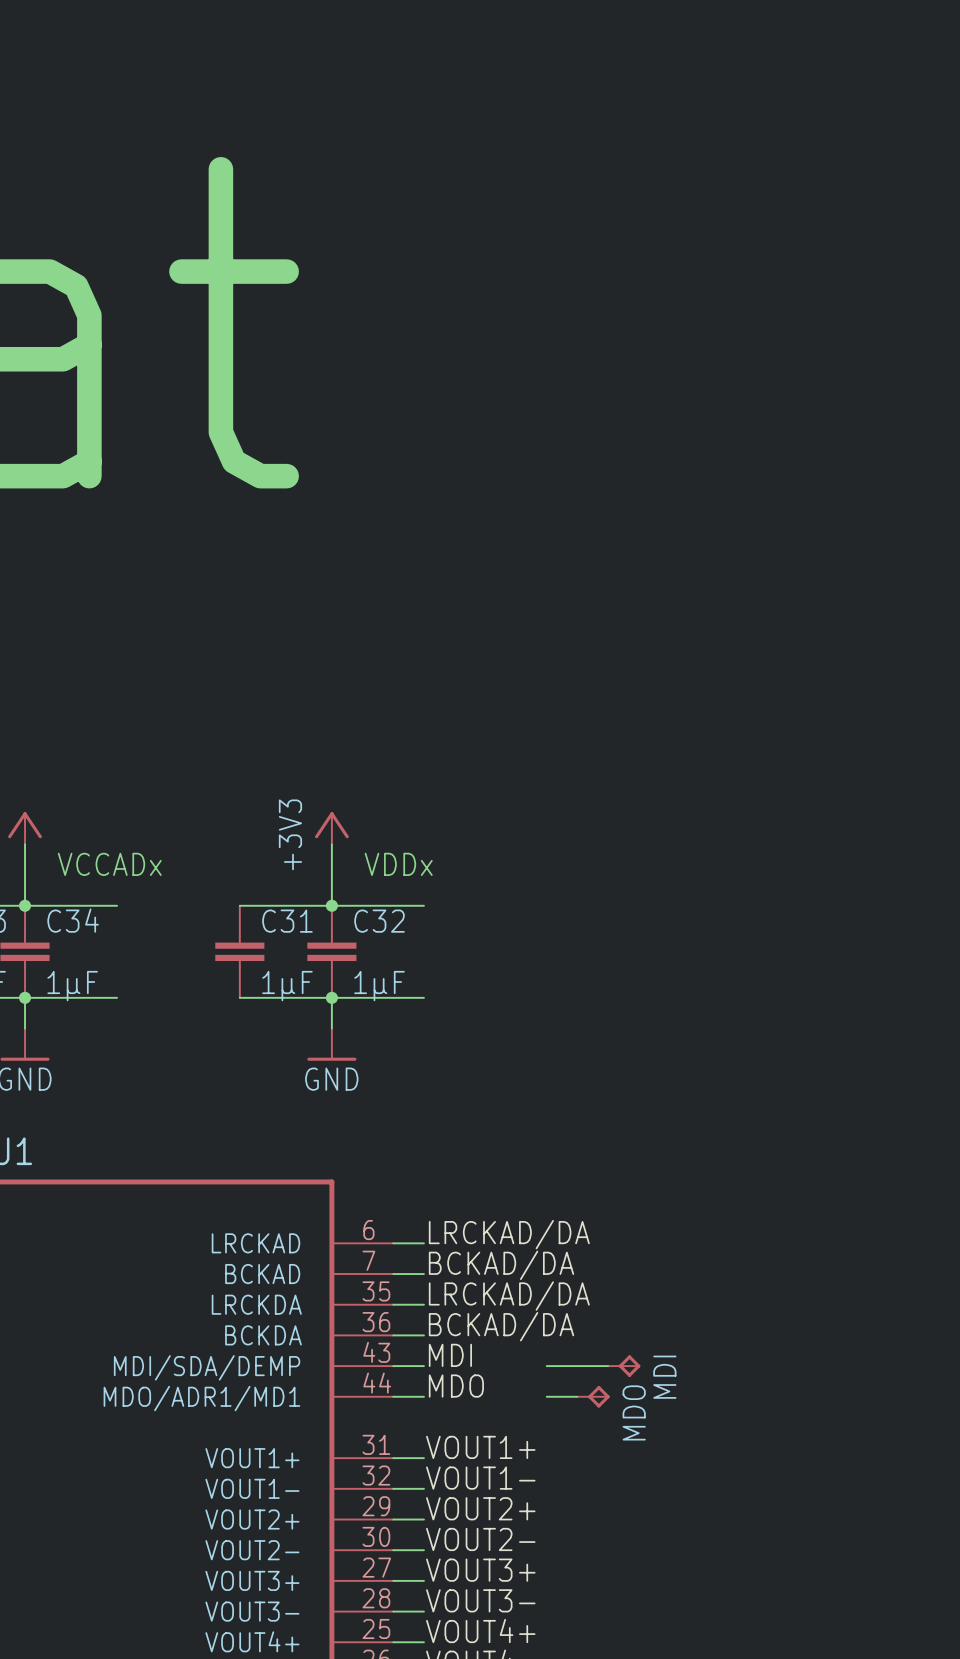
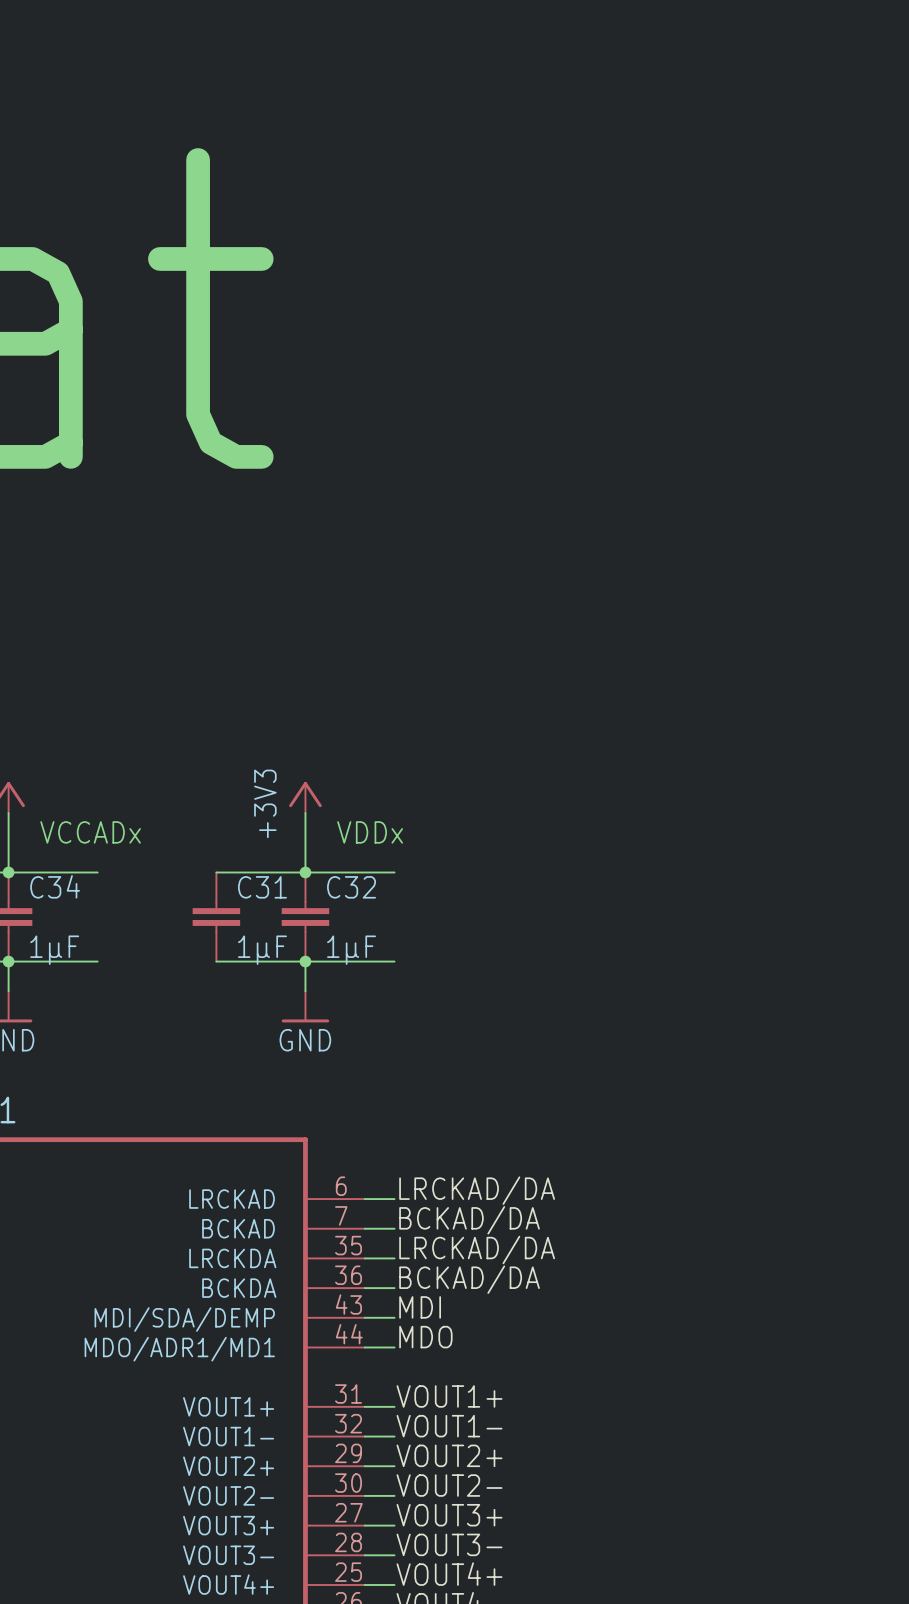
wire: (546, 1366) (608, 1366) -> none
MDI: (624, 1366) -> none
wire: (546, 1396) (577, 1396) -> none
MDO: (593, 1396) -> none

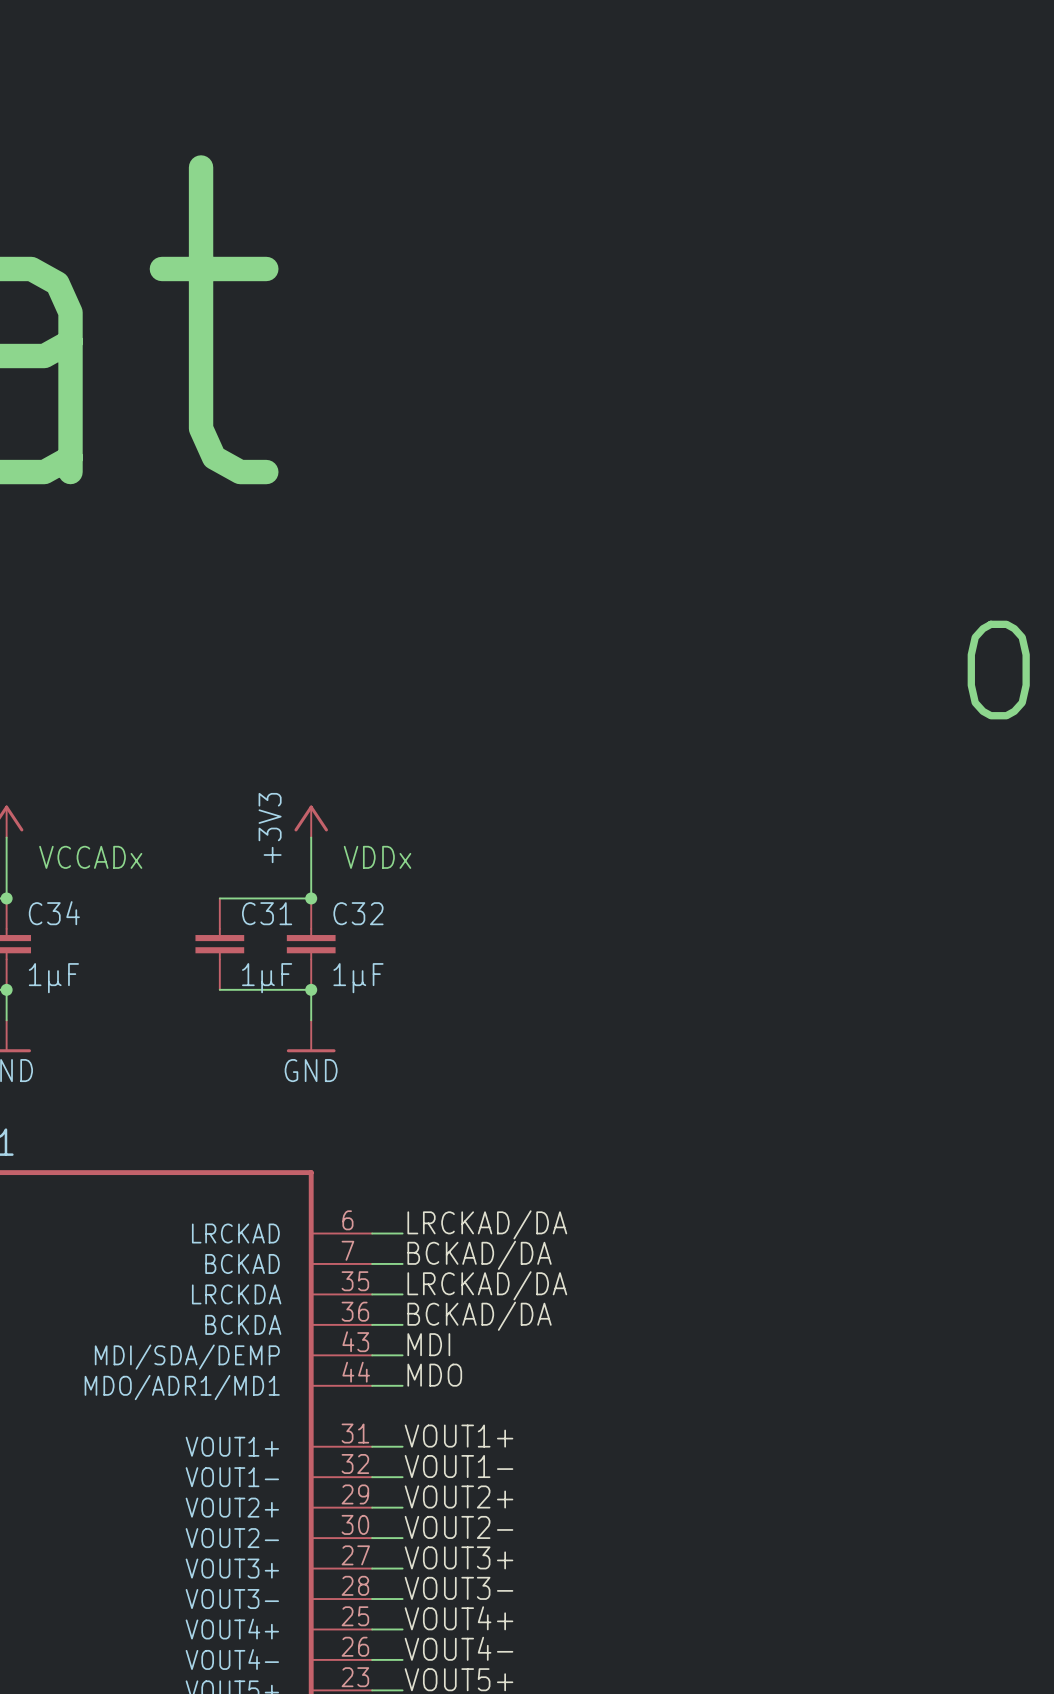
wire: (8, 872) (97, 872) -> none
wire: (305, 872) (394, 872) -> none
wire: (8, 961) (97, 961) -> none
wire: (305, 961) (394, 961) -> none

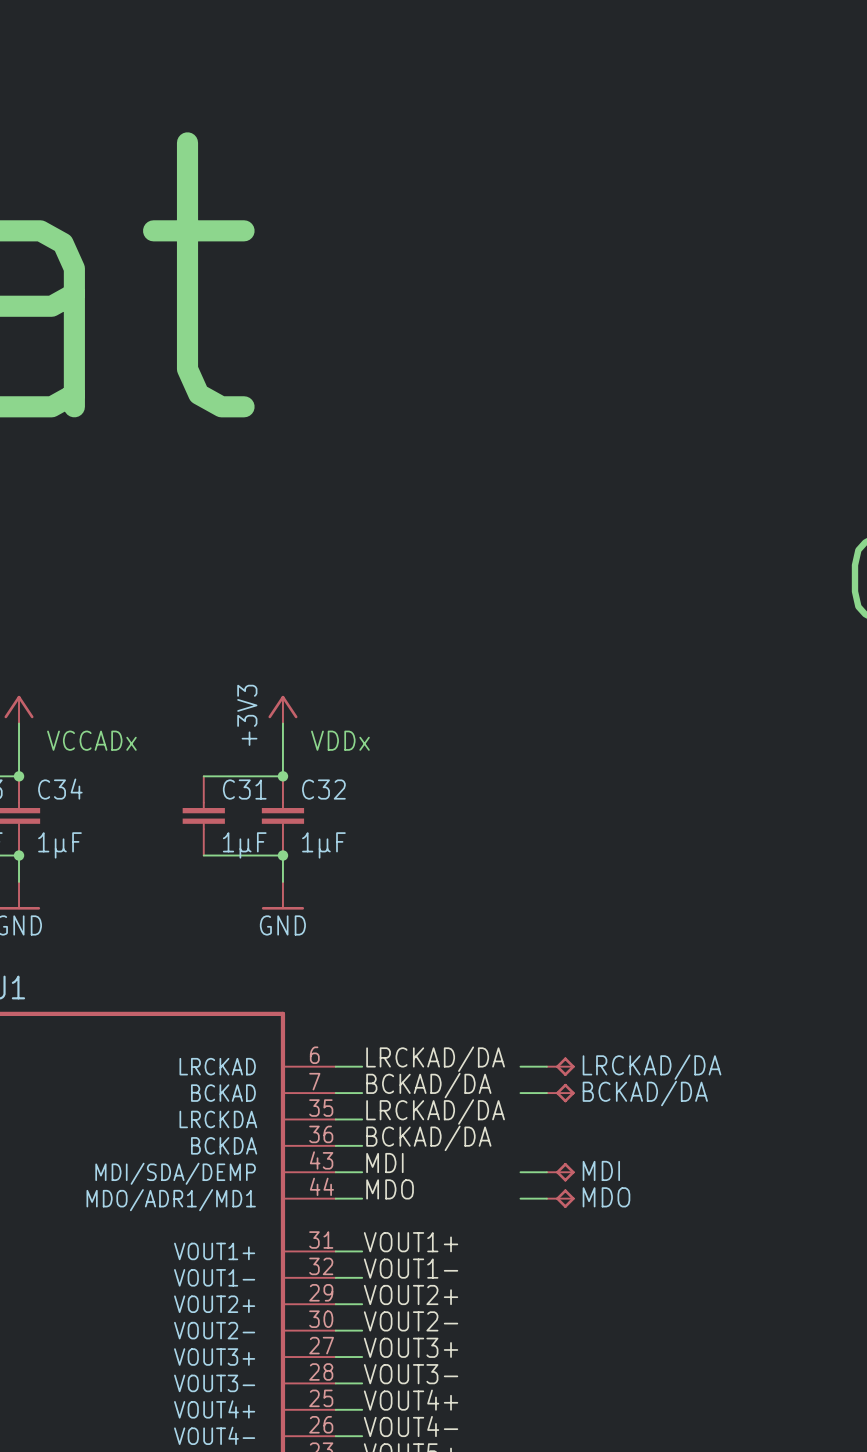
wire: none -> (520, 1066) (546, 1066)
LRCKAD/DA: none -> (560, 1066)
wire: none -> (520, 1093) (546, 1093)
BCKAD/DA: none -> (560, 1093)
wire: none -> (520, 1172) (546, 1172)
MDI: none -> (560, 1172)
wire: none -> (520, 1198) (546, 1198)
MDO: none -> (560, 1198)

